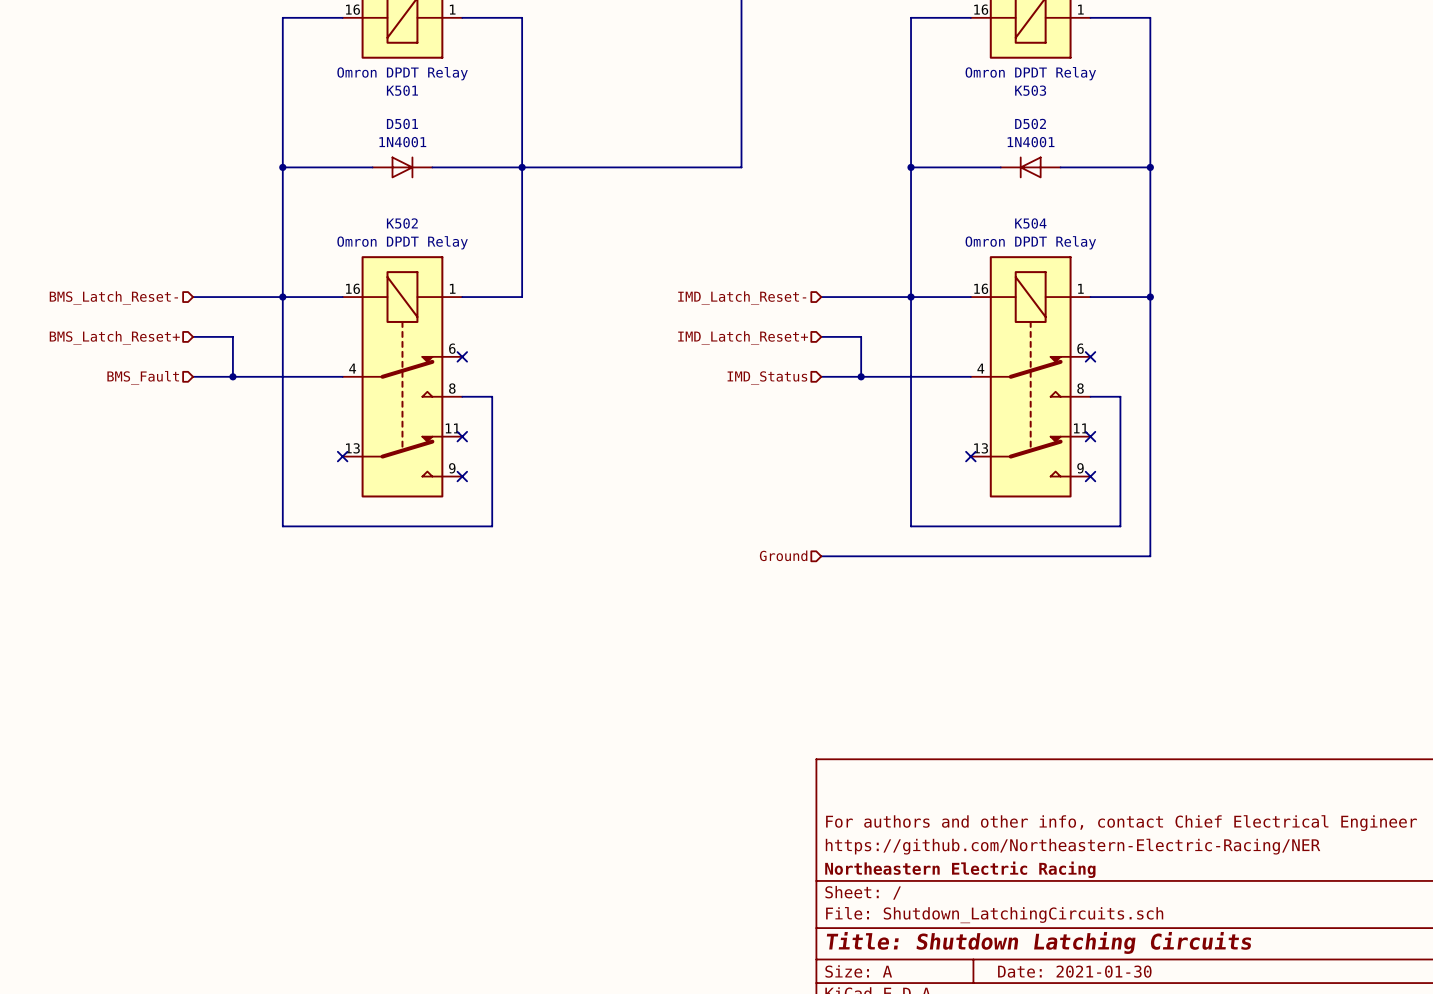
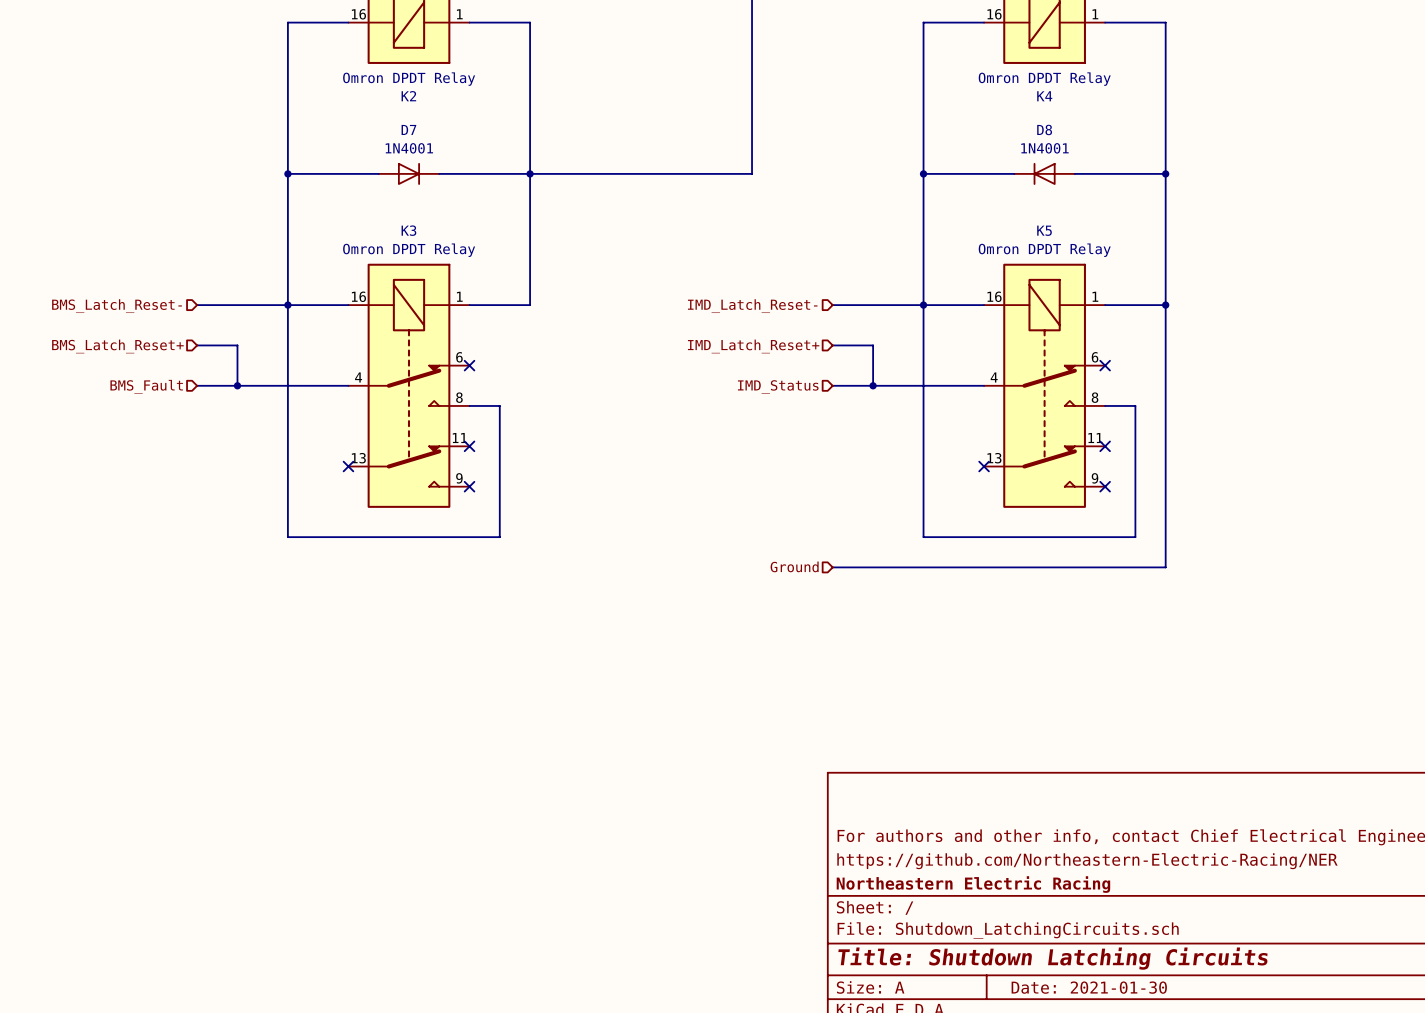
K501 name: K501 (402, 90) -> K2 (408, 96)
K503 name: K503 (1030, 90) -> K4 (1044, 96)
D501 name: D501 (402, 123) -> D7 (408, 129)
D502 name: D502 (1030, 123) -> D8 (1044, 129)
K502 name: K502 (402, 223) -> K3 (408, 230)
K504 name: K504 (1030, 223) -> K5 (1044, 230)

